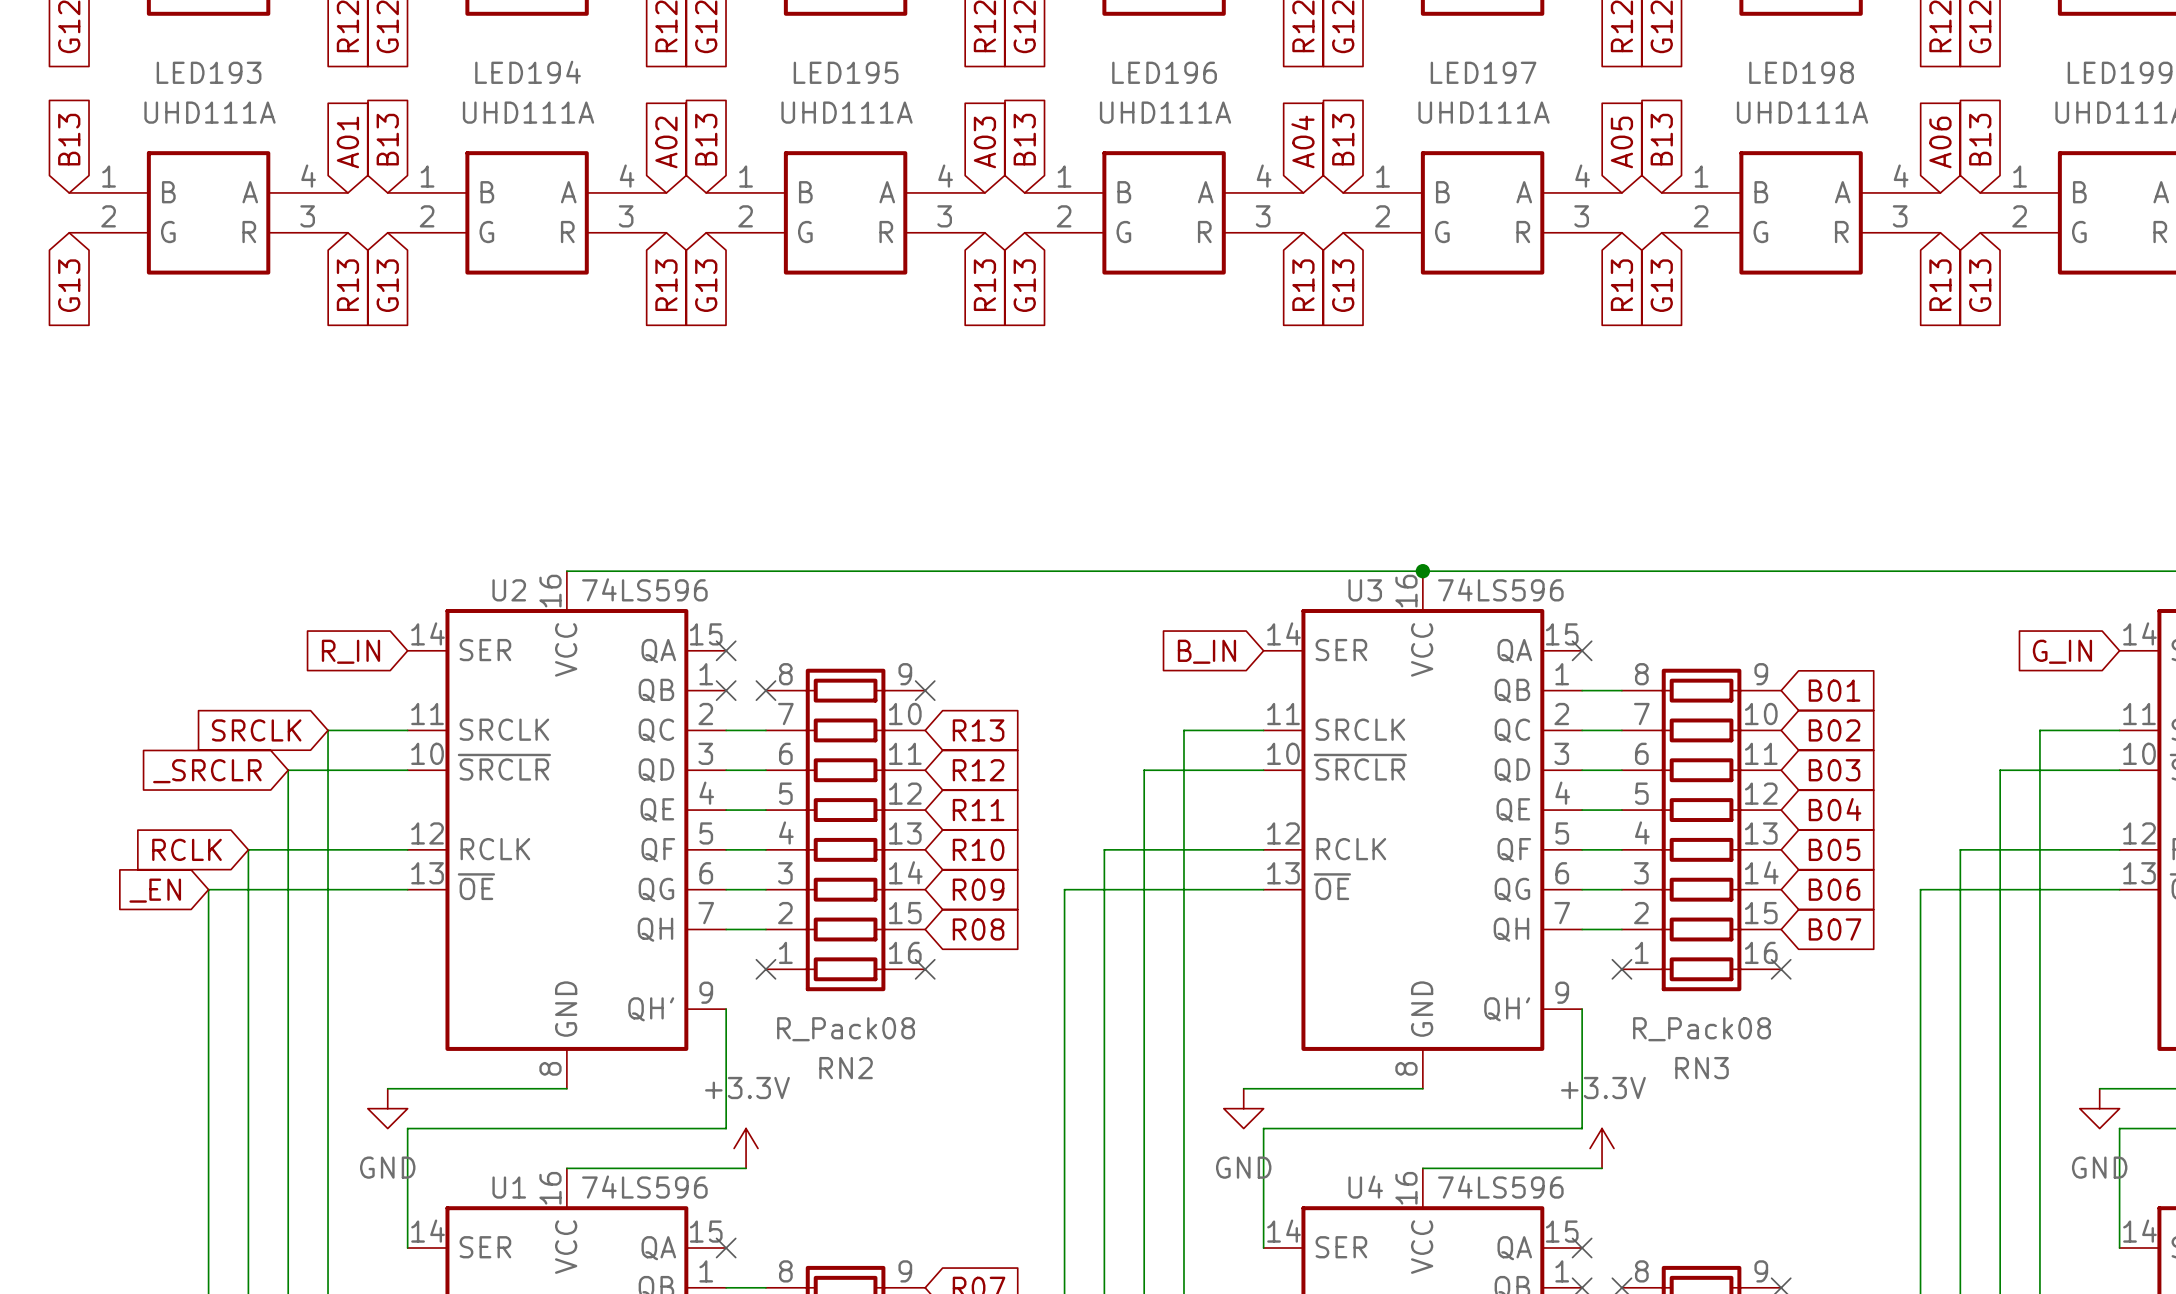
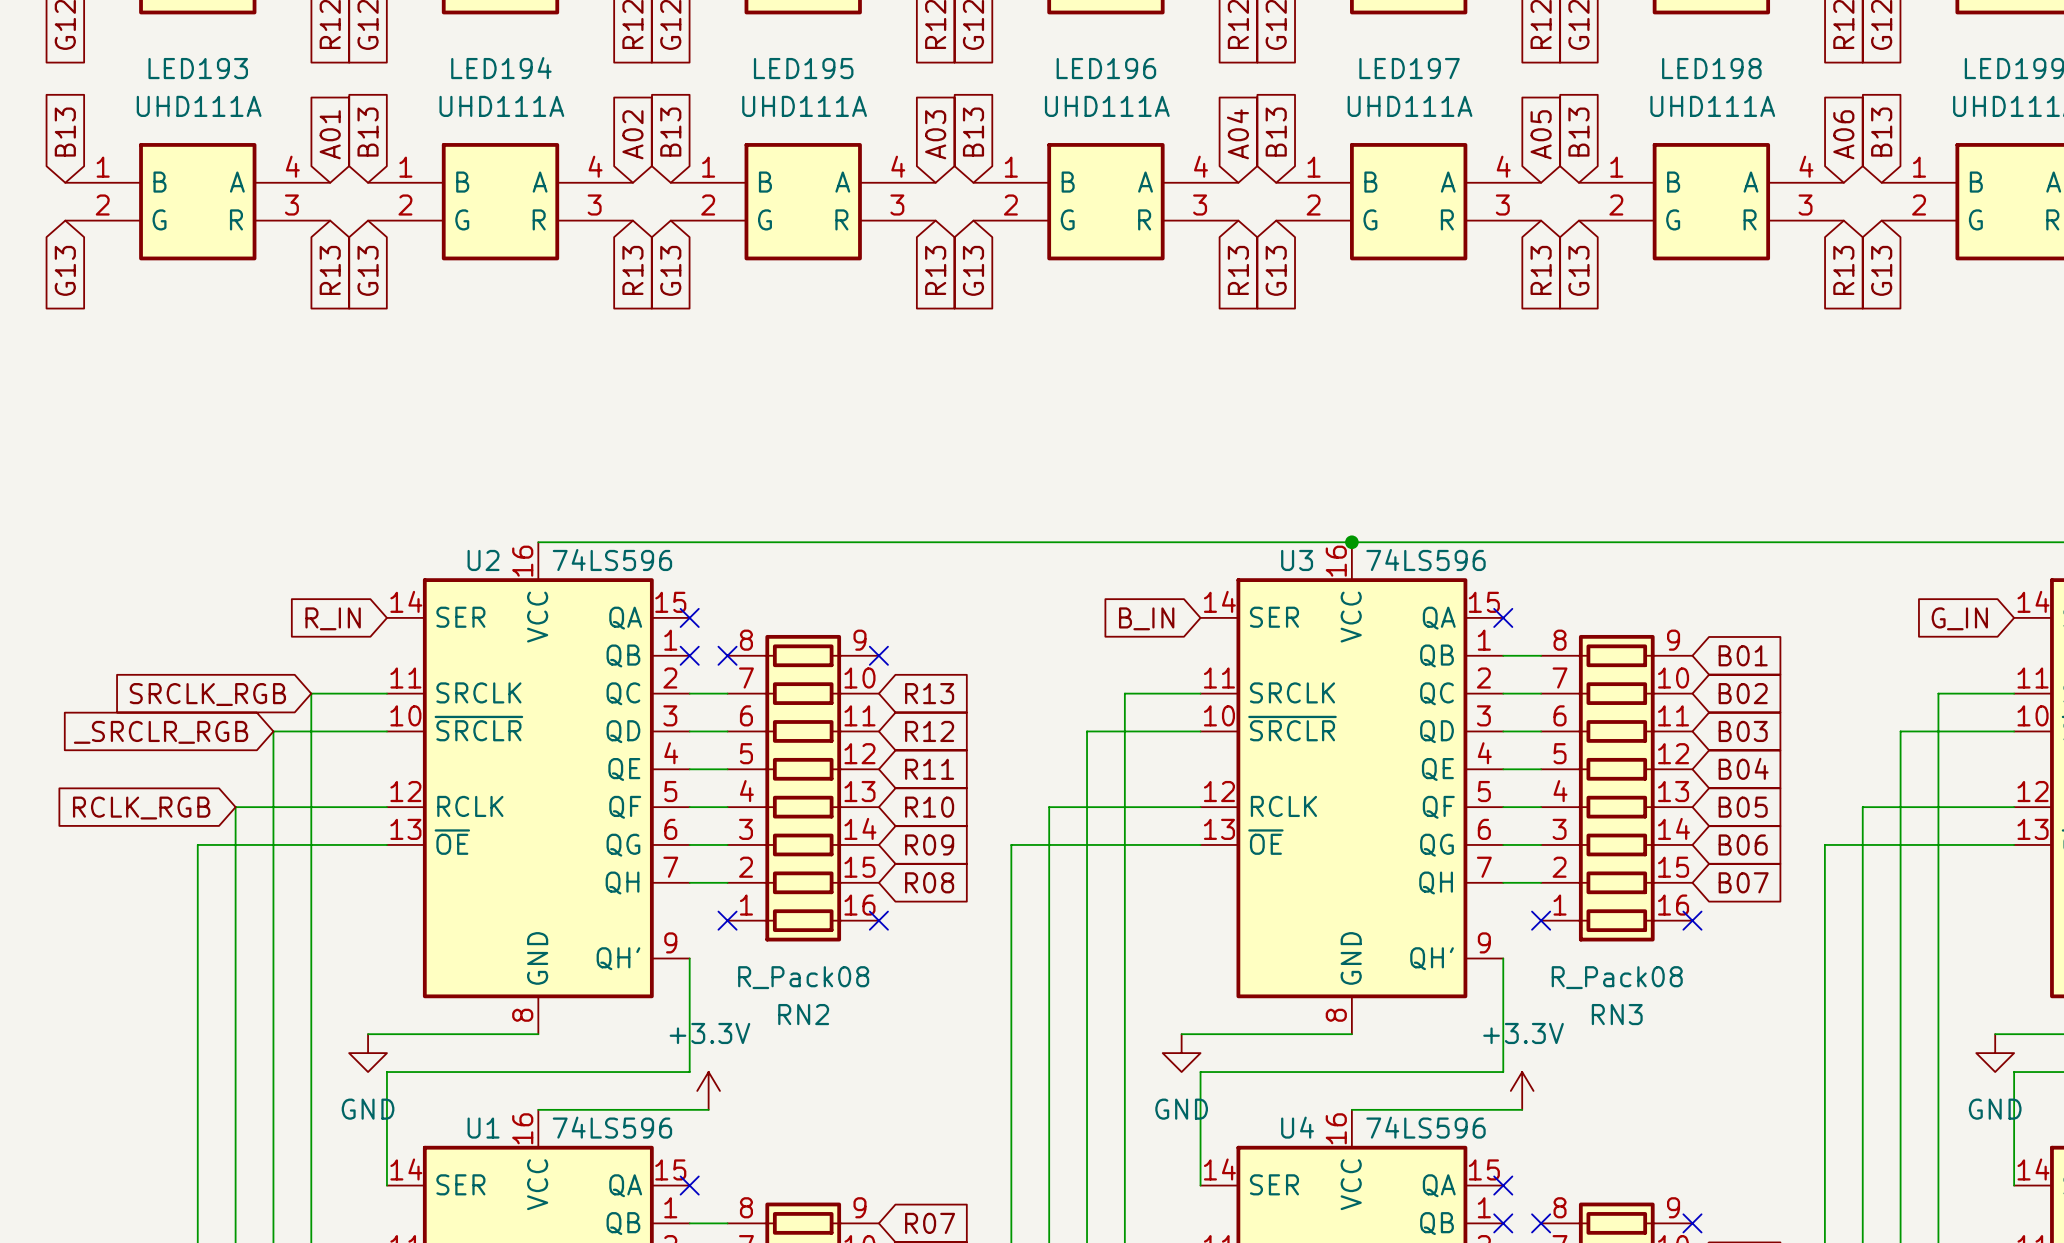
global label: SRCLK (256, 730) -> SRCLK_RGB (207, 694)
global label: _SRCLR (207, 771) -> _SRCLR_RGB (161, 732)
global label: RCLK (186, 849) -> RCLK_RGB (141, 808)
global label: _EN (155, 890) -> none

